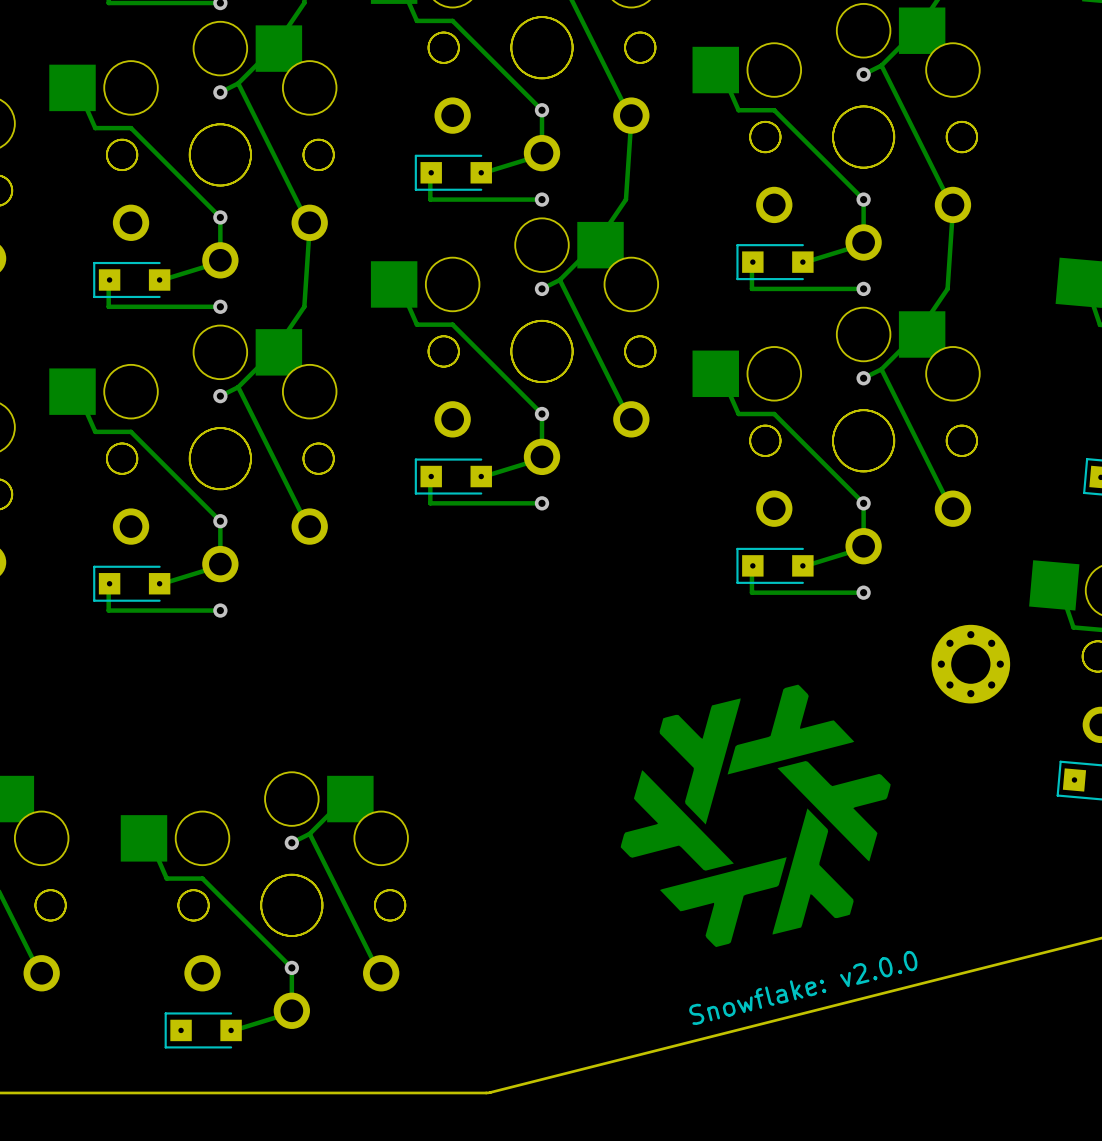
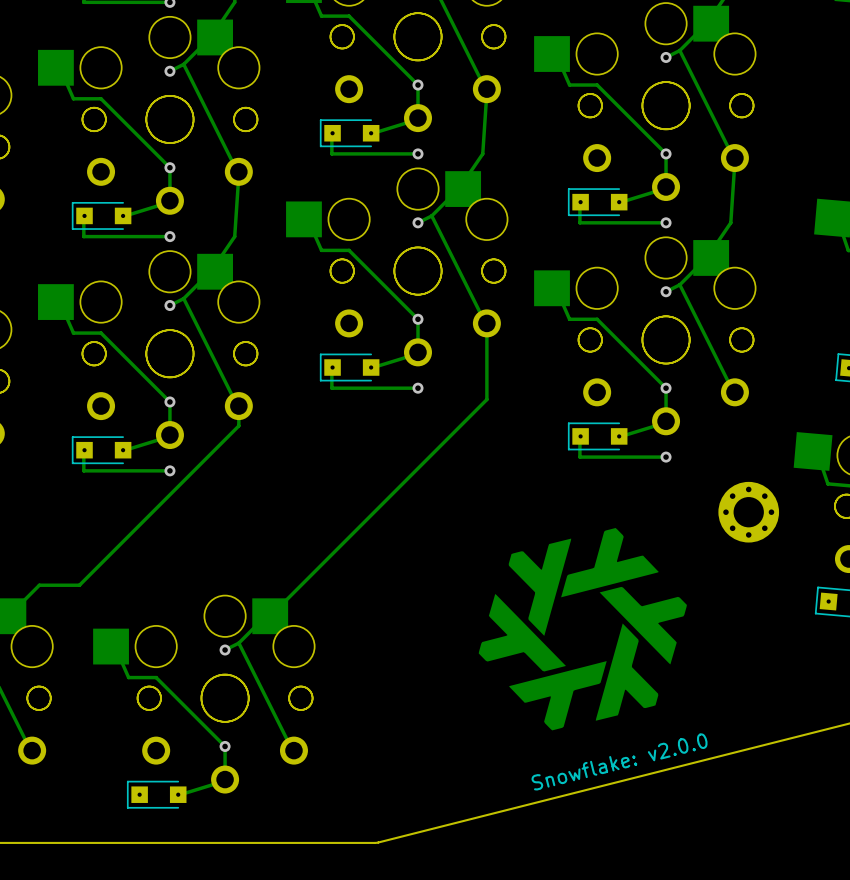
track: none -> (486, 323) (486, 399) (270, 616)
track: none -> (238, 406) (238, 425) (79, 585) (39, 585) (8, 616)

